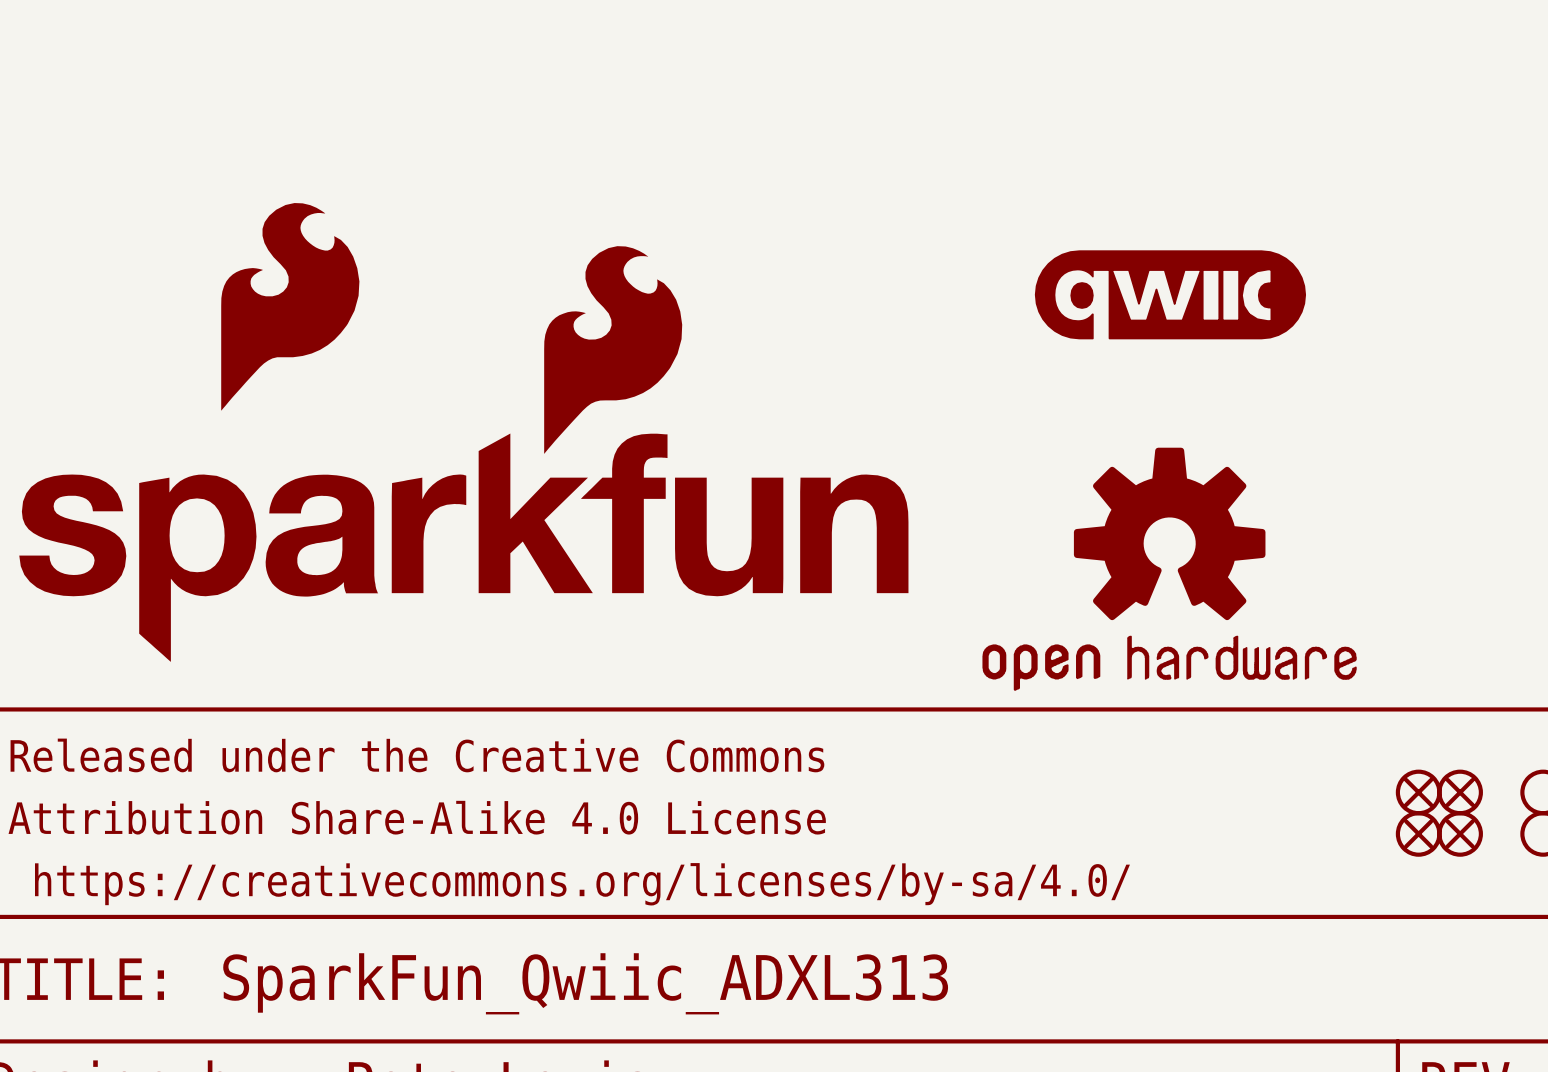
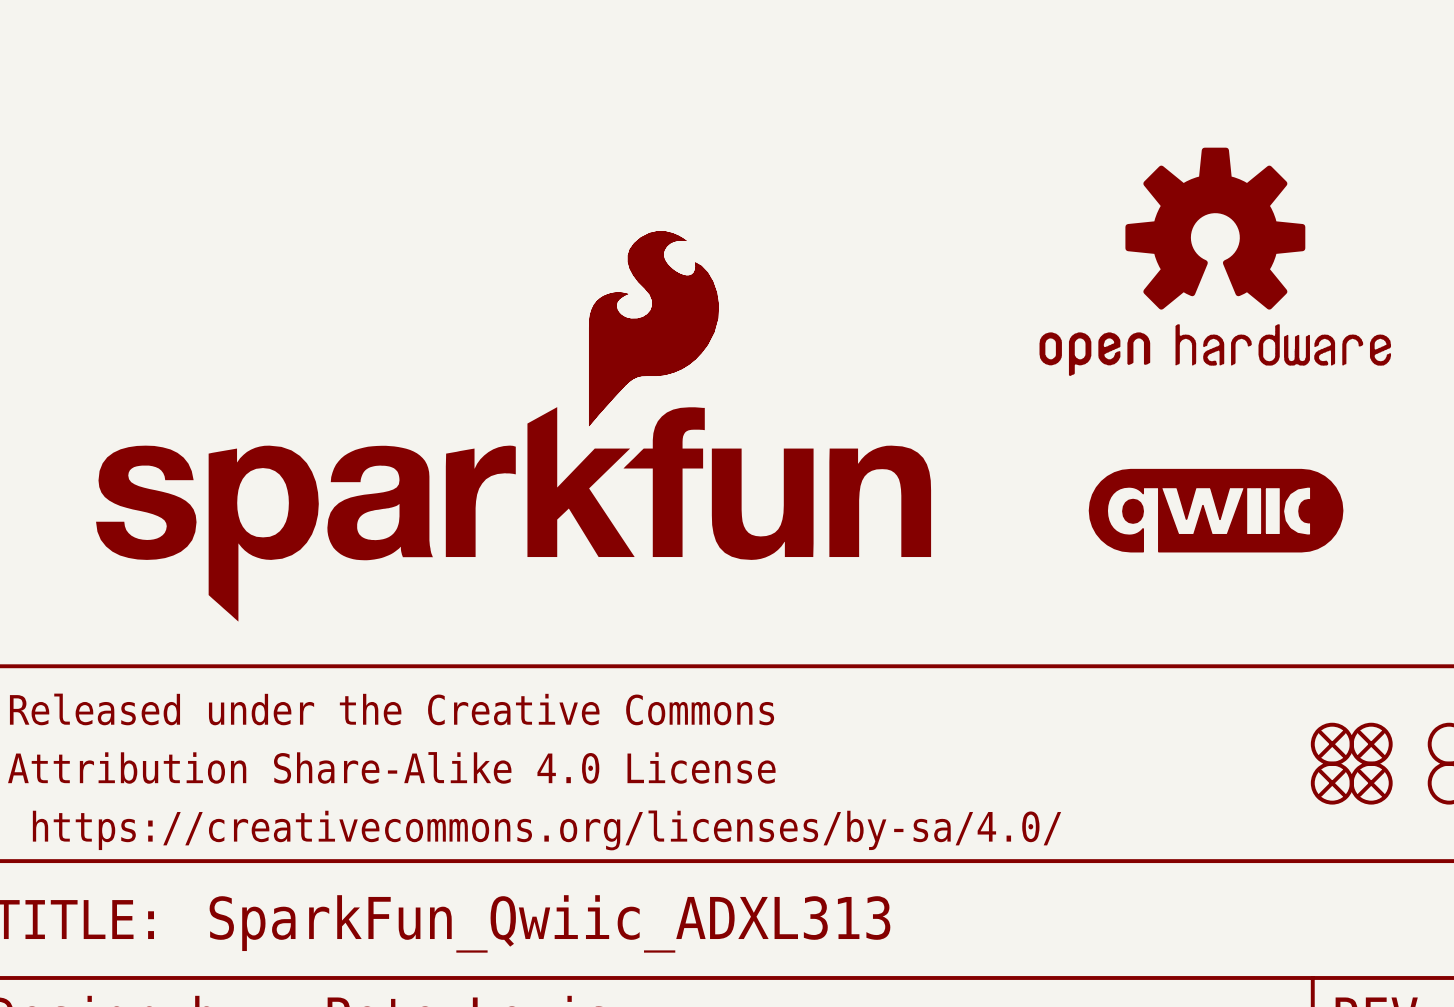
part position: (1170, 294) -> (1216, 510)
part: (290, 306) -> none
part position: (463, 454) -> (513, 426)
part position: (1169, 569) -> (1215, 261)

